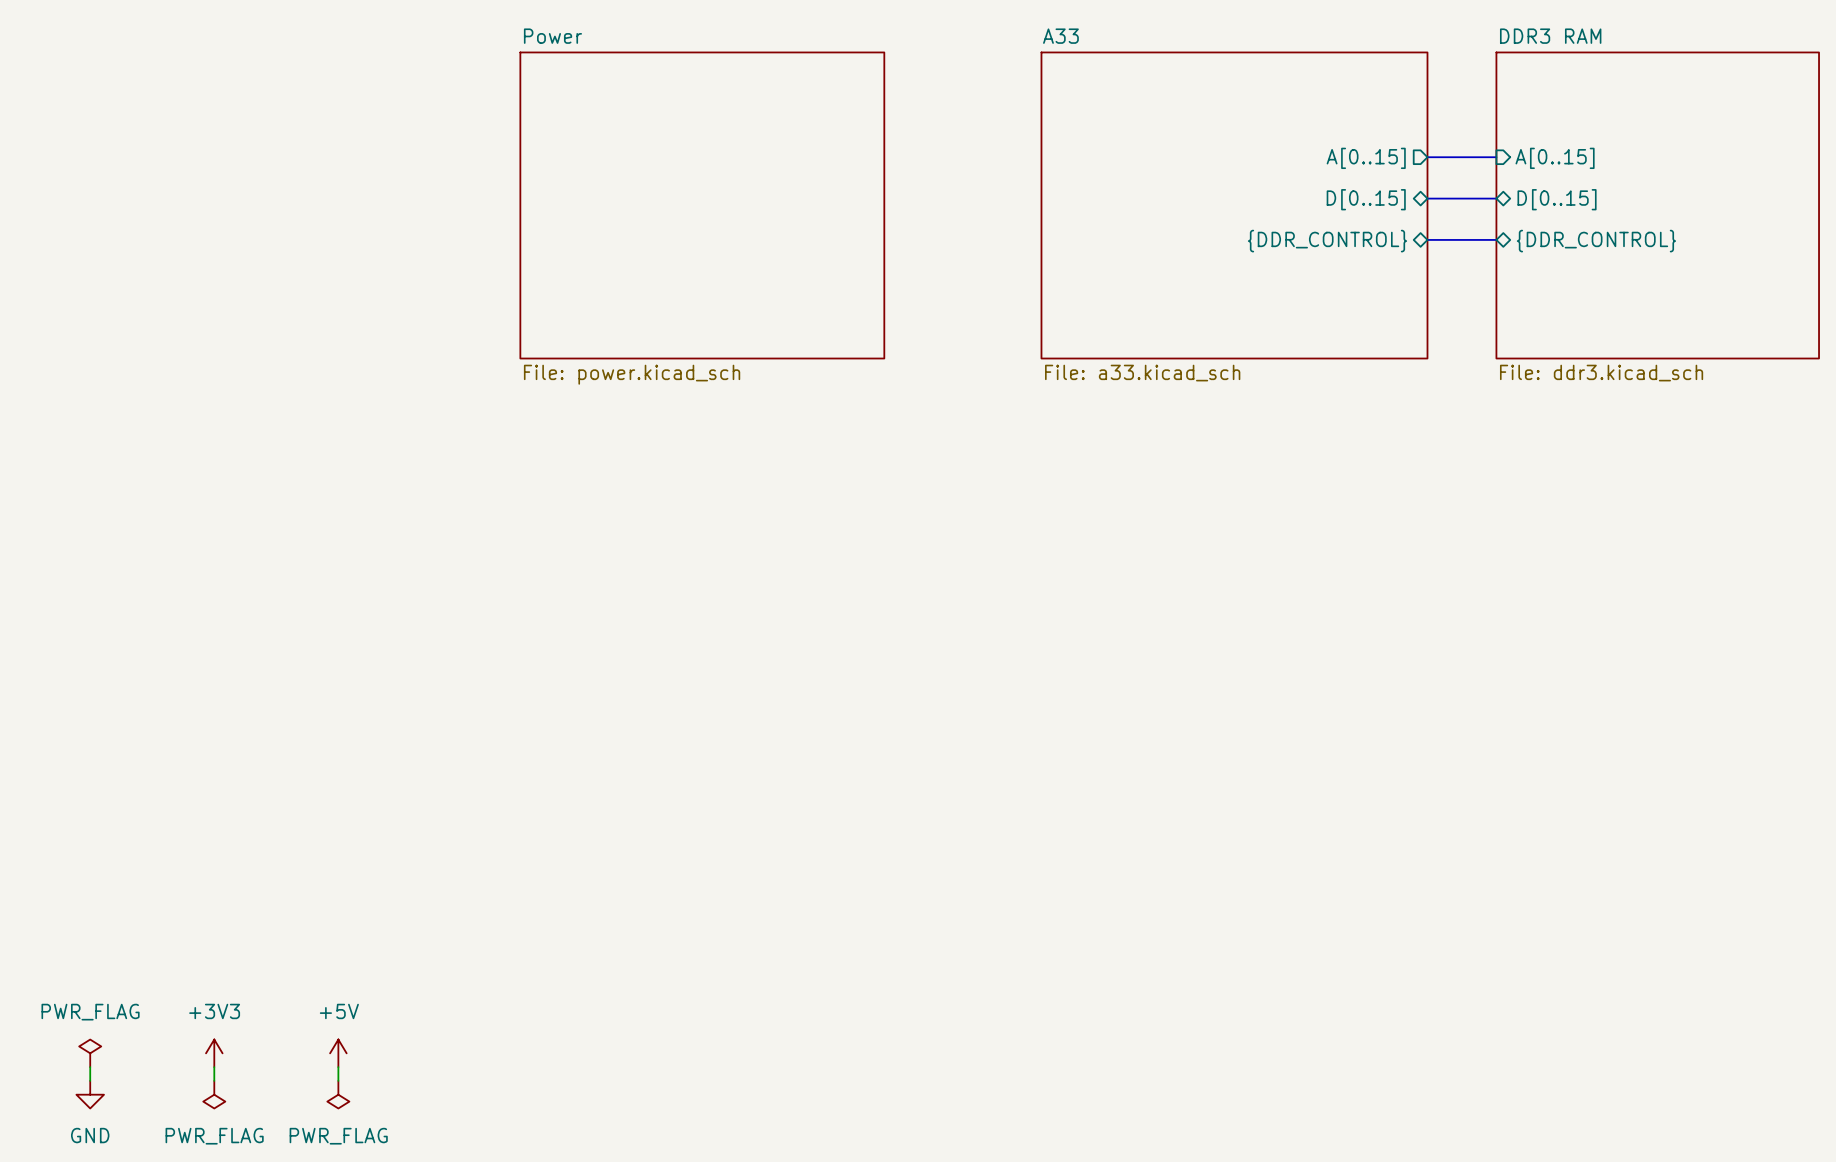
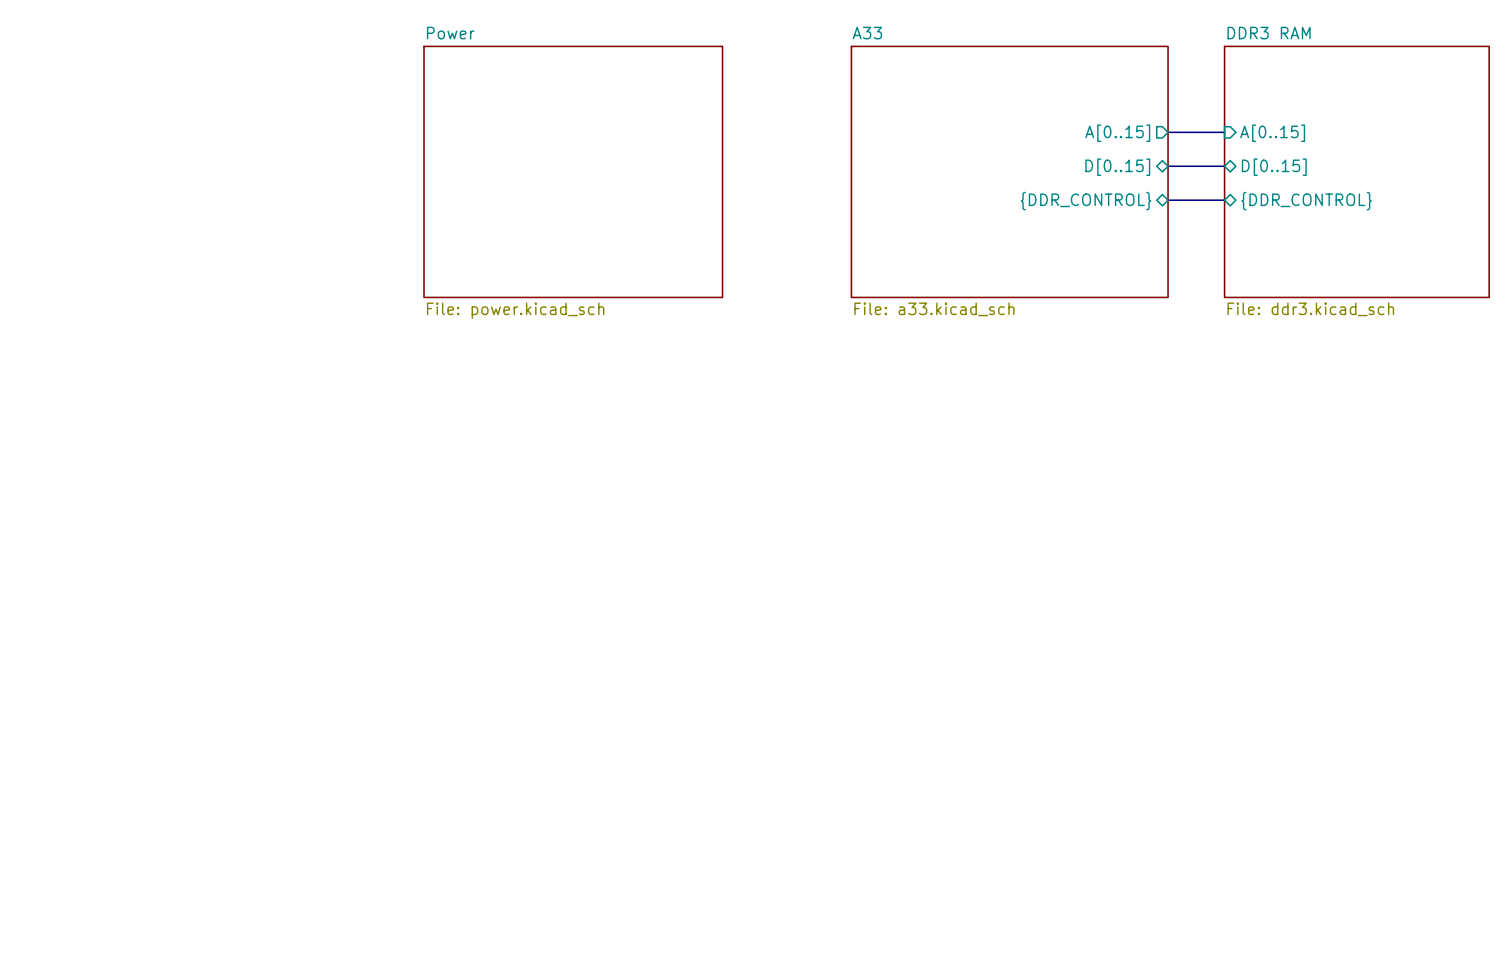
power symbol: PWR_FLAG (90, 1053) -> none
power symbol: +3V3 (214, 1053) -> none
power symbol: +5V (338, 1053) -> none
wire: (90, 1067) (90, 1080) -> none
wire: (214, 1067) (214, 1080) -> none
wire: (338, 1067) (338, 1080) -> none
power symbol: GND (90, 1094) -> none
power symbol: PWR_FLAG (214, 1094) -> none
power symbol: PWR_FLAG (338, 1094) -> none

